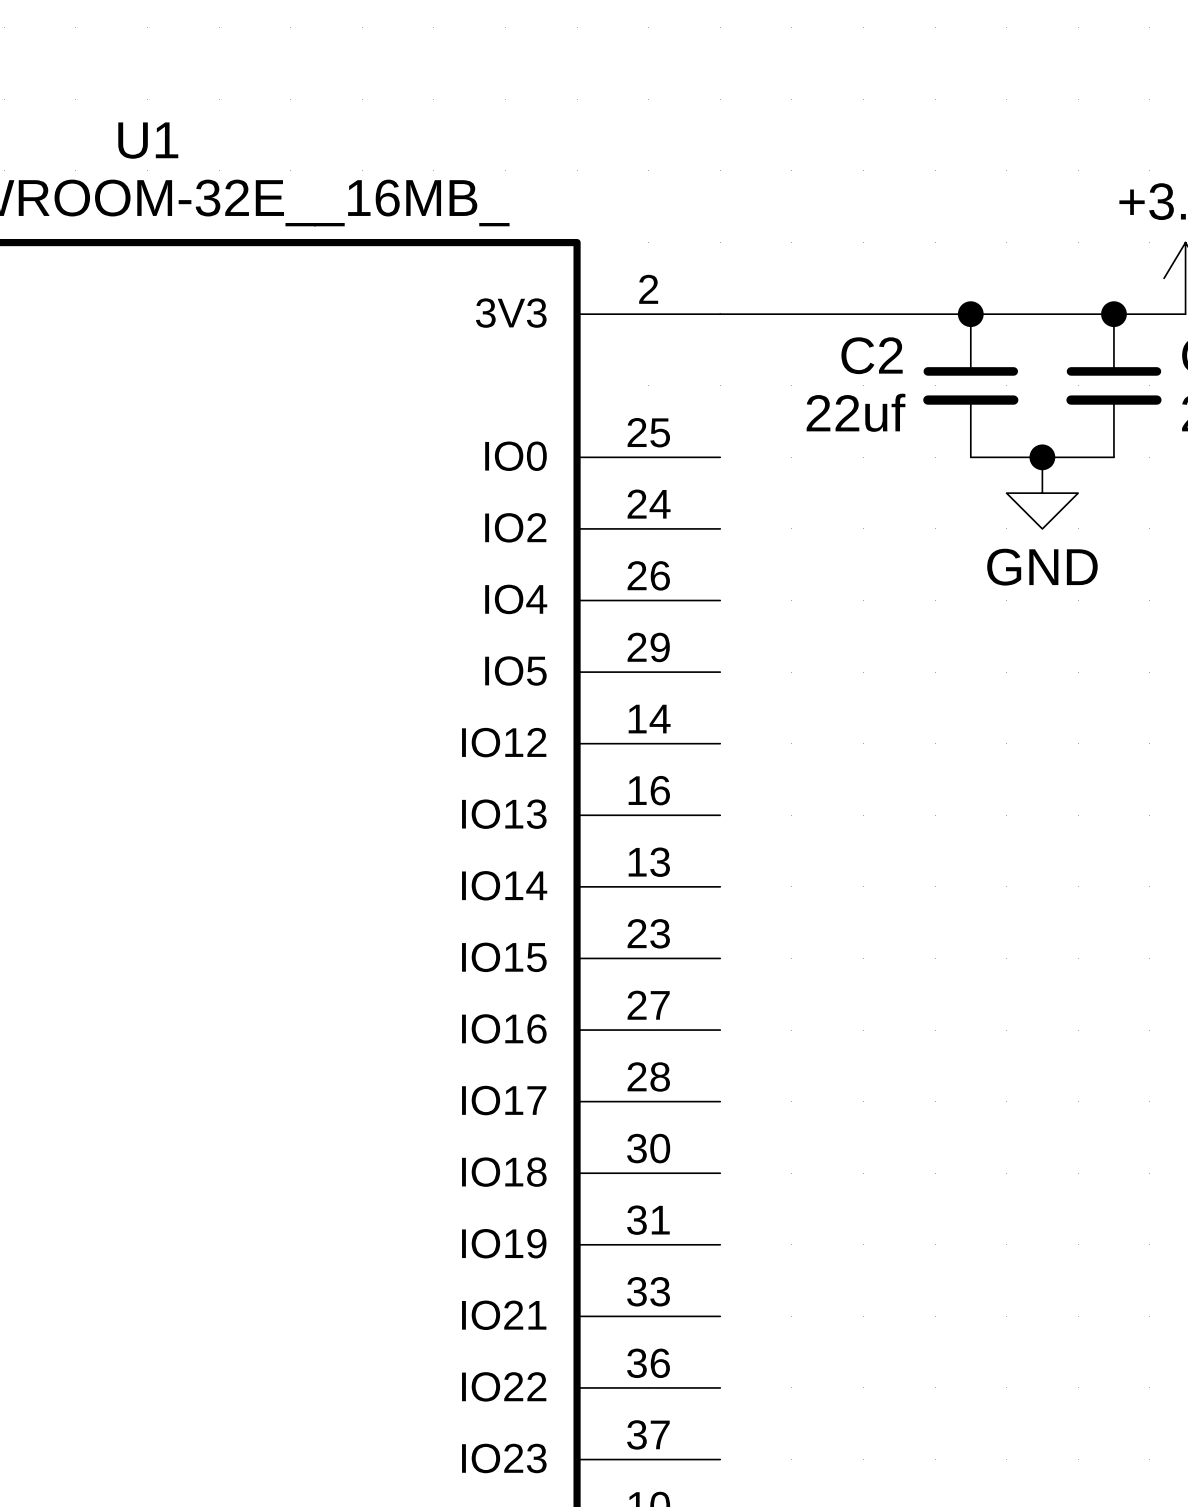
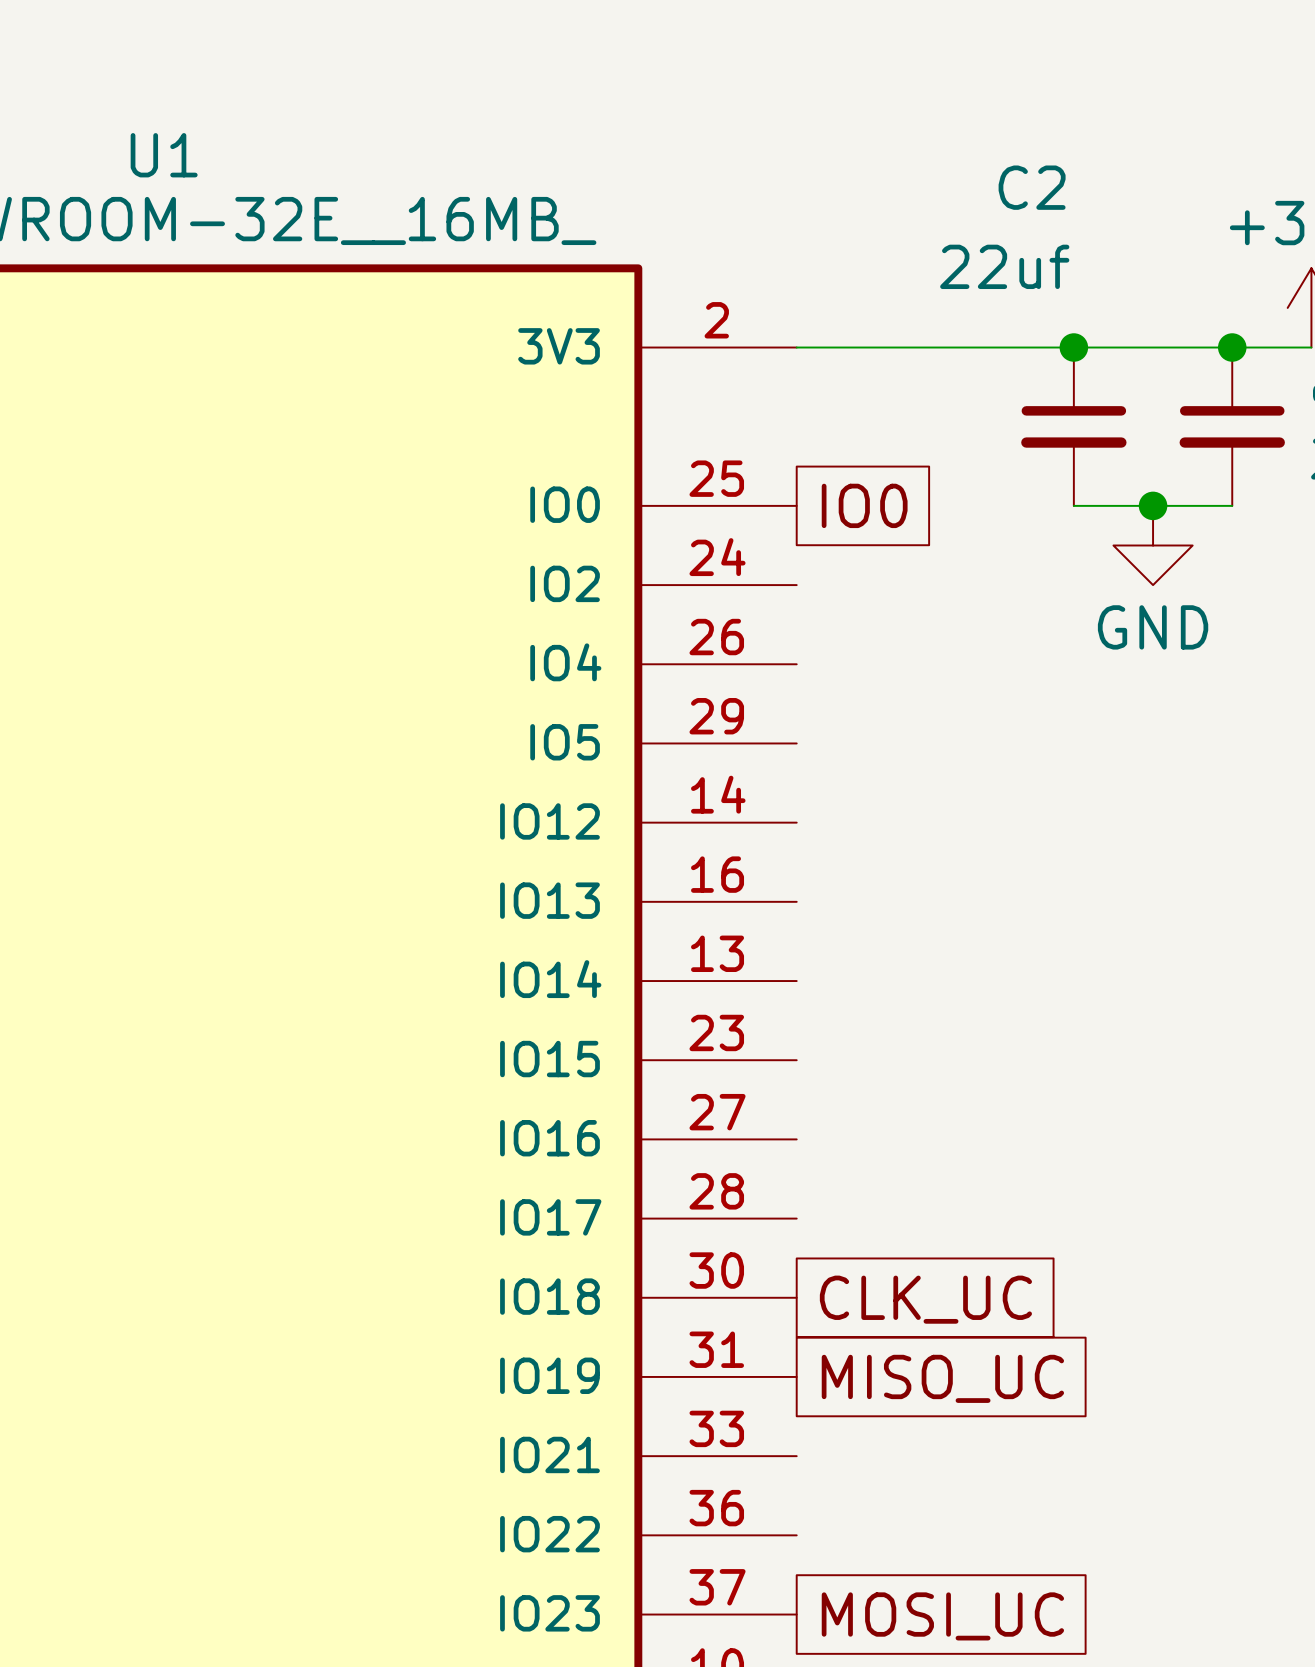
C2 name position: C2 (872, 355) -> C2 (1032, 187)
C2 value position: 22uf (856, 412) -> 22uf (1004, 266)
global label: none -> IO0 (864, 505)
global label: none -> CLK_UC (925, 1299)
global label: none -> MISO_UC (942, 1378)
global label: none -> MOSI_UC (942, 1616)

